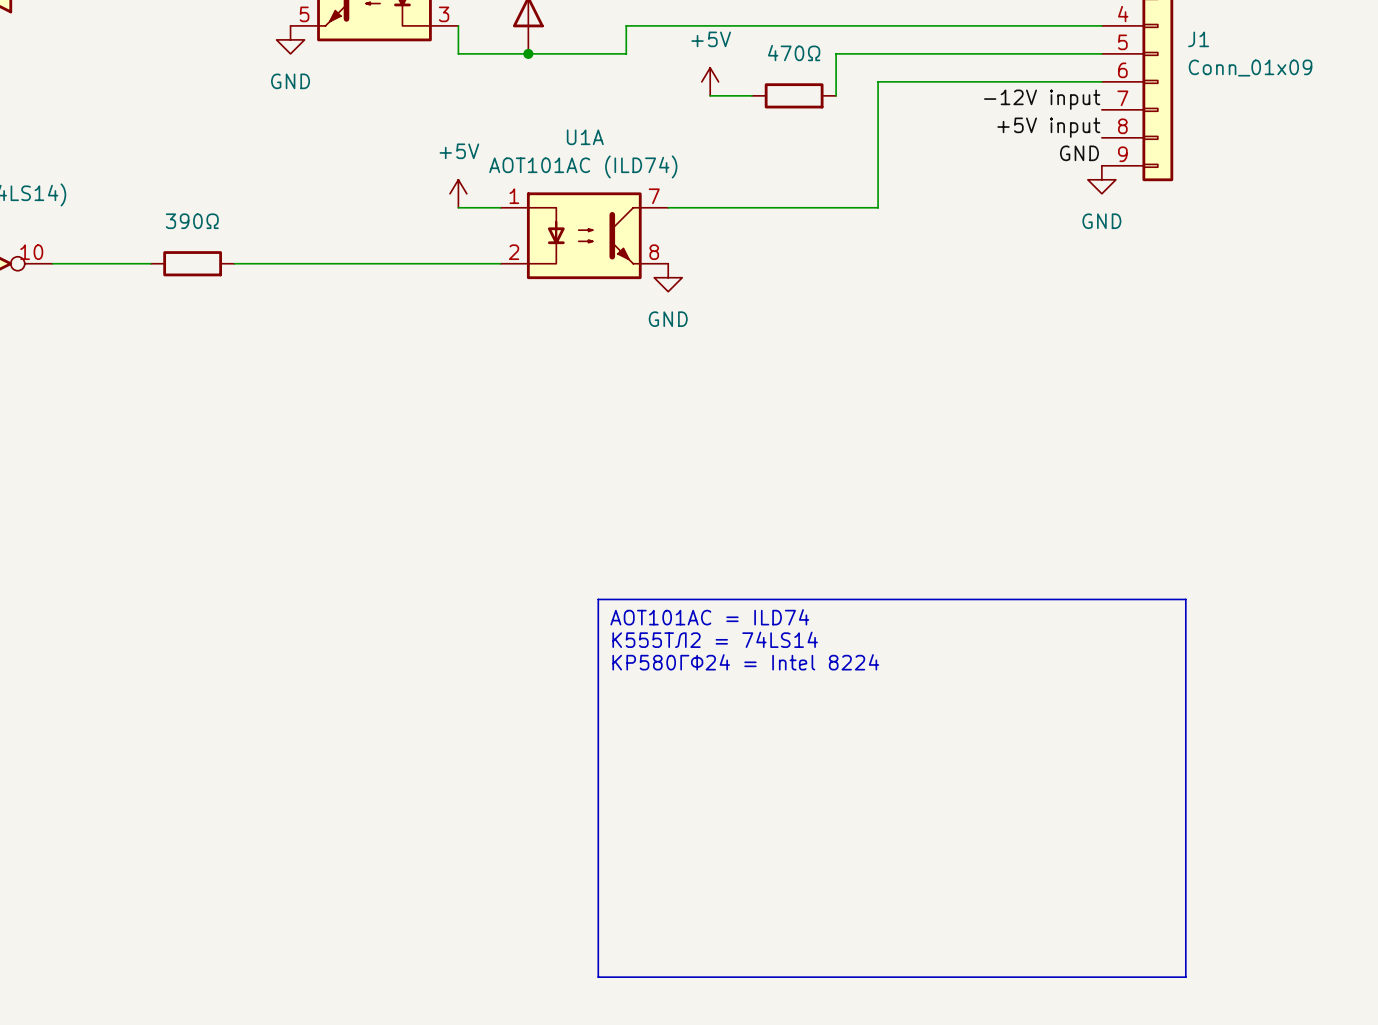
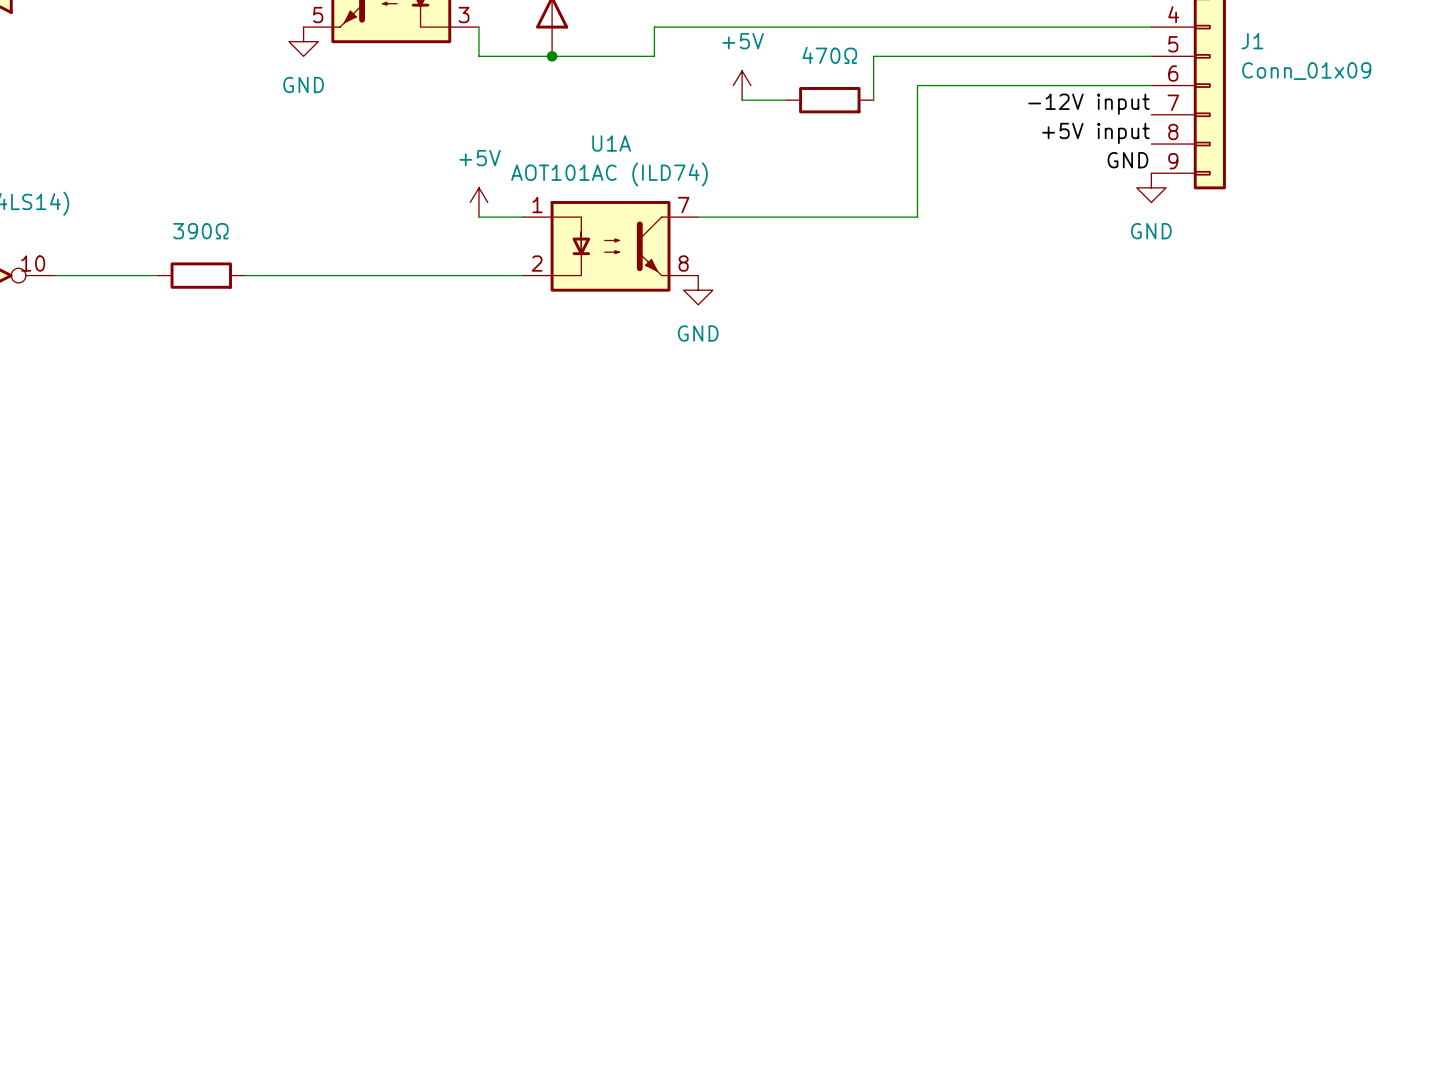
line: (598, 599) (1185, 599) (1185, 977) (598, 977) (598, 599) -> none
text: АОТ101АС = ILD74 (709, 617) -> none
text: К555ТЛ2 = 74LS14 (715, 639) -> none
text: КР580ГФ24 = Intel 8224 (745, 662) -> none

